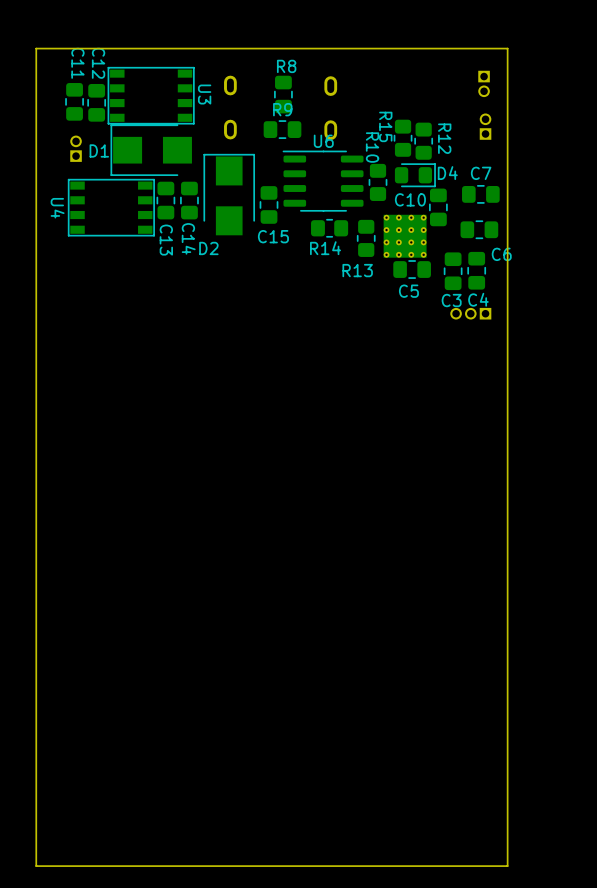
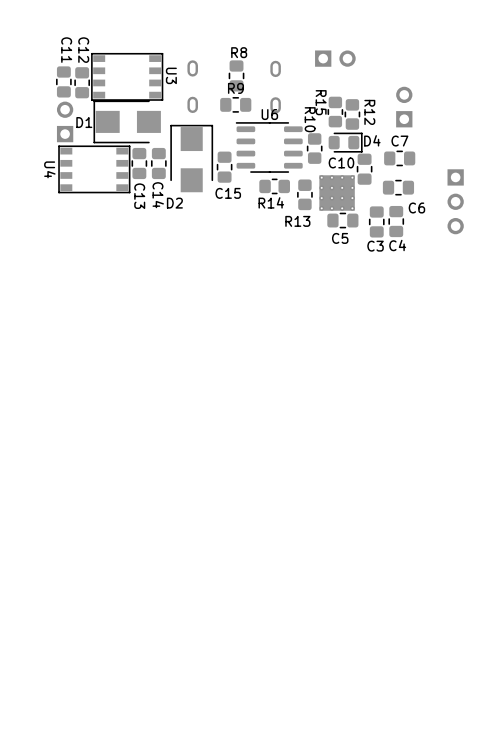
board edge: (507, 48) (36, 48) (36, 866) (507, 866) (507, 48) -> none
part: none -> (335, 58)
part: (484, 83) -> none
part footprint: [479, 113, 492, 140] -> [396, 86, 413, 128]
part footprint: [70, 135, 82, 162] -> [56, 101, 74, 143]
part: none -> (455, 201)
part: (470, 313) -> none

